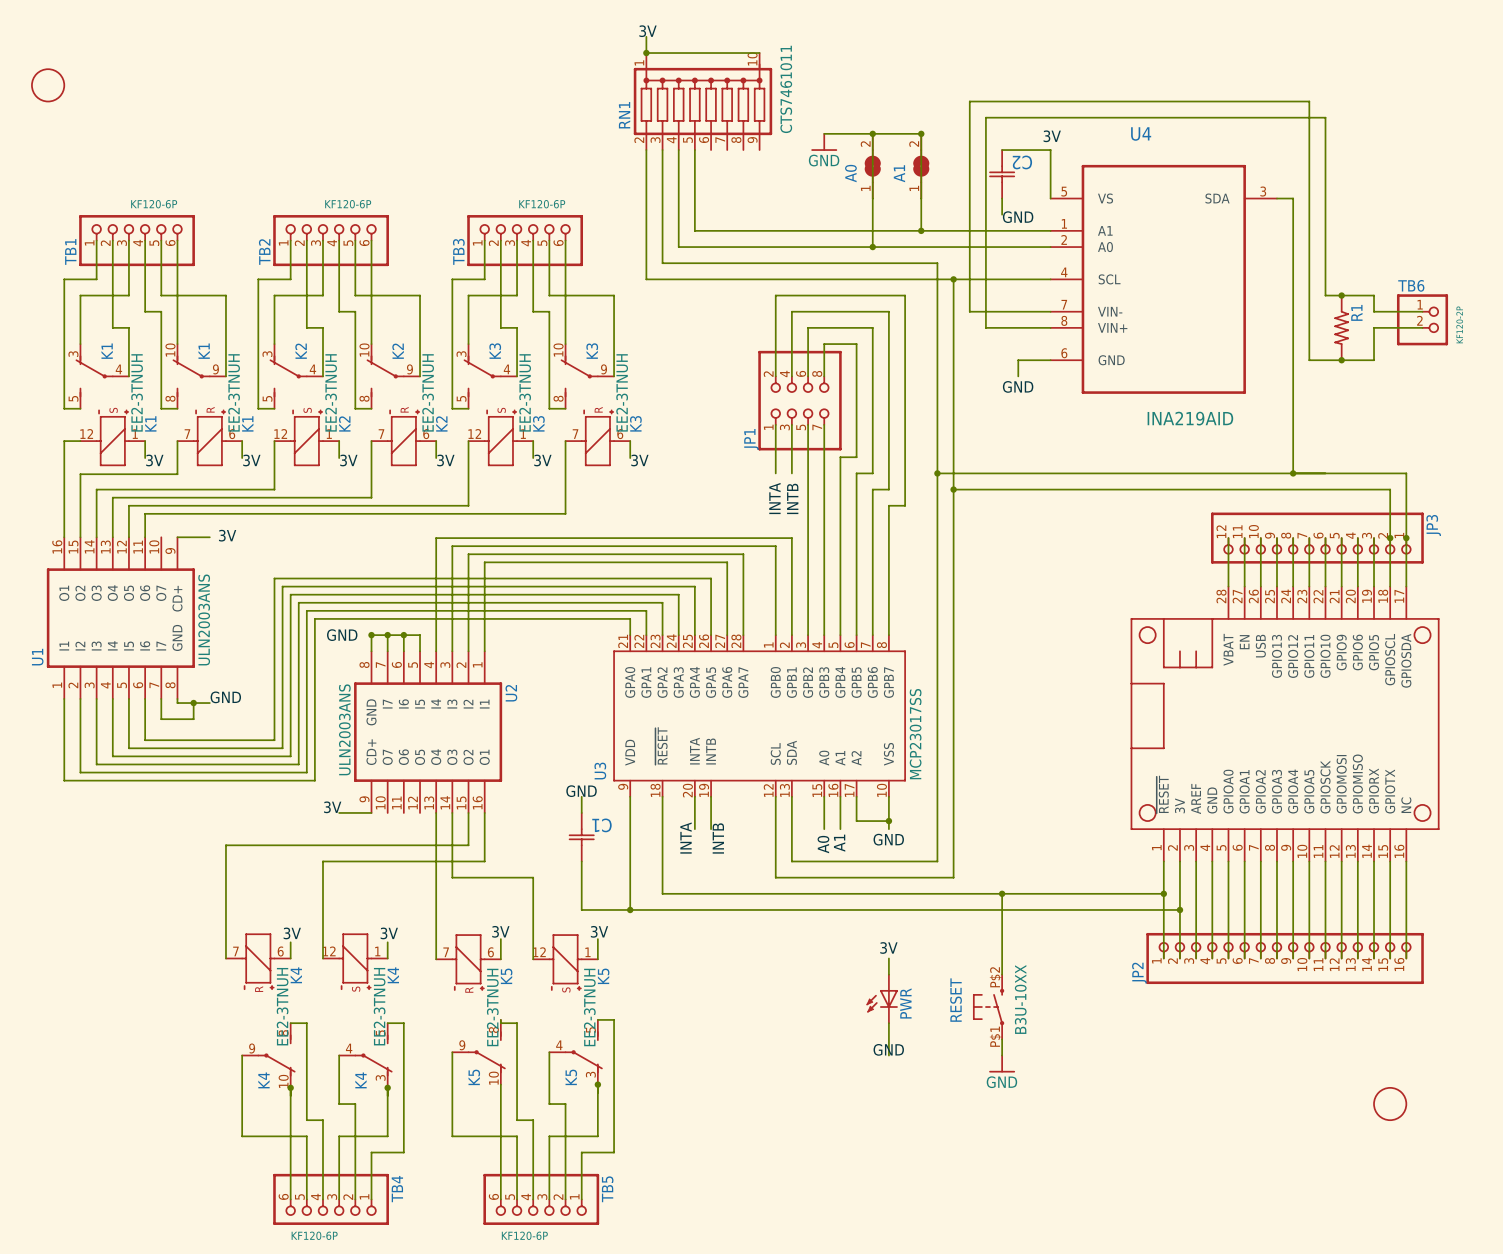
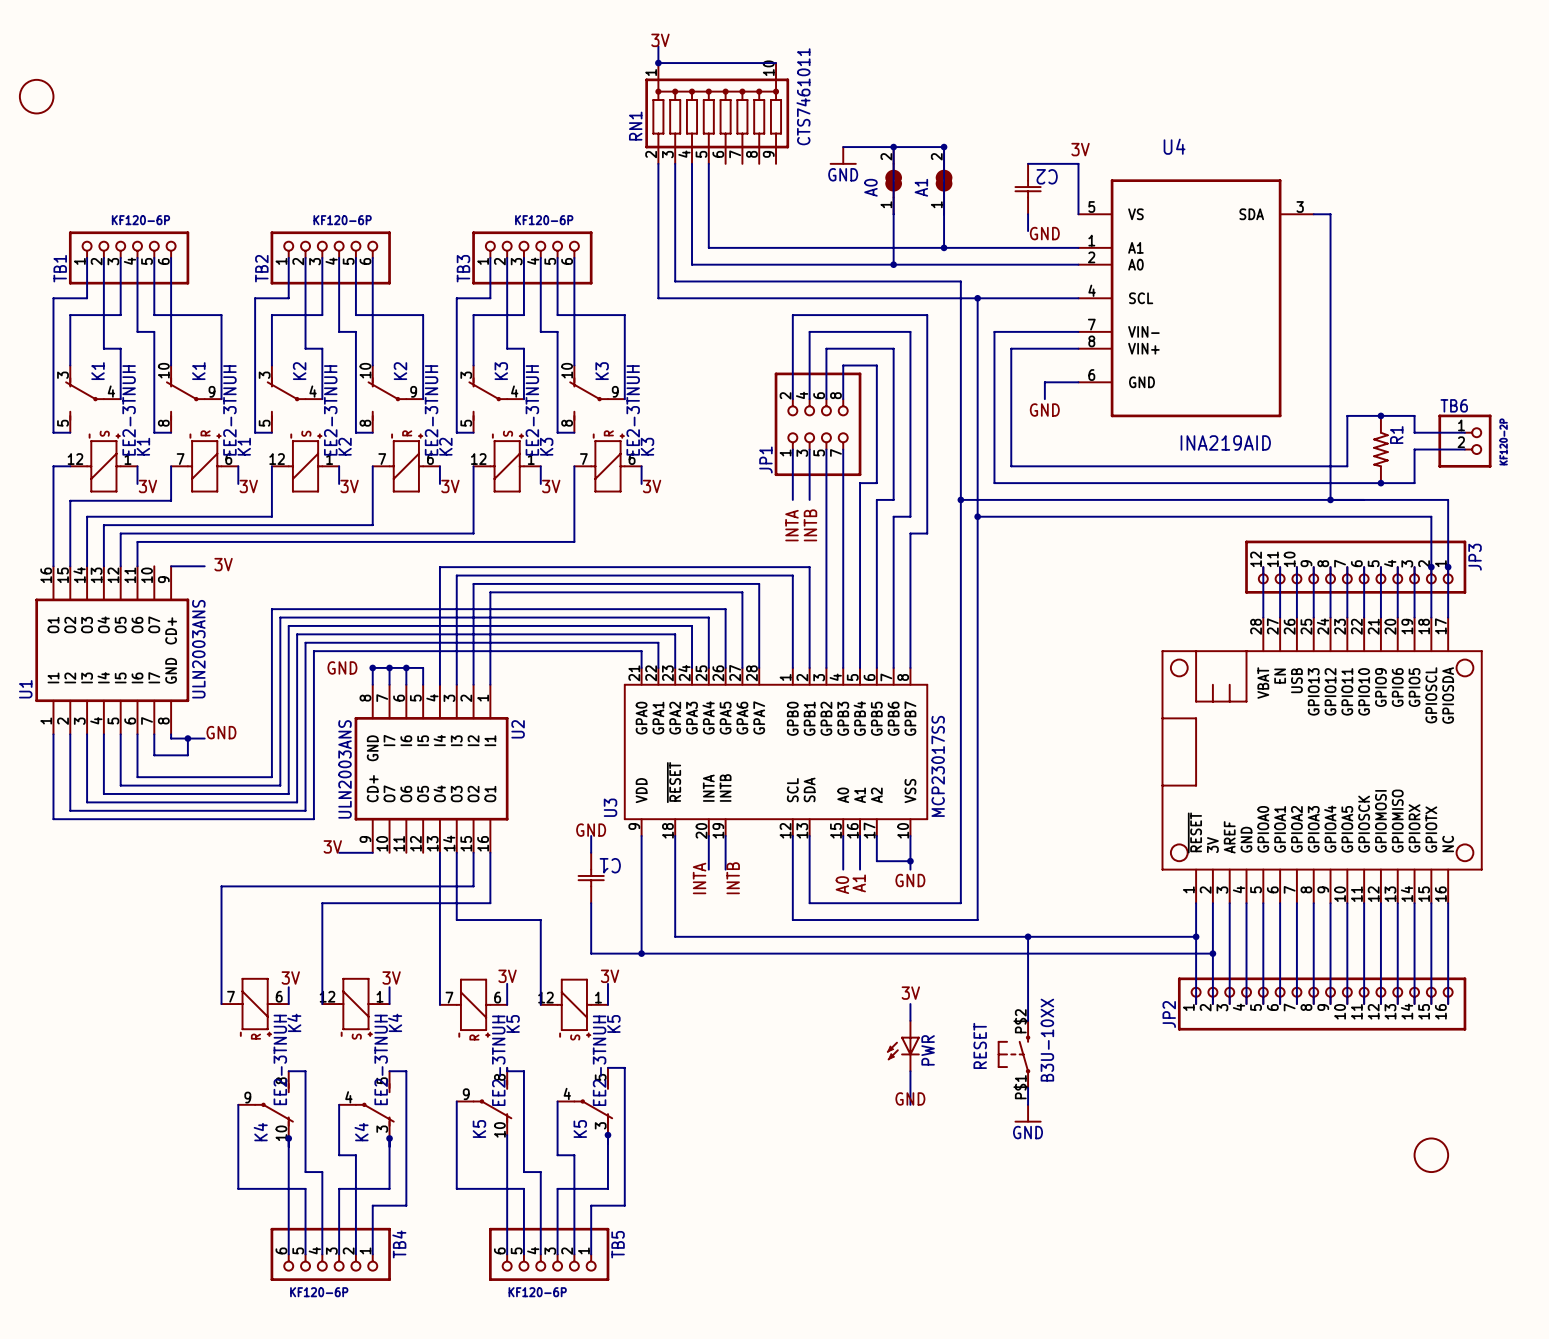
junction: (1341, 295) -> none
wire: (969, 311) (969, 101) (1309, 101) (1309, 360) (1374, 360) (1374, 327) (1422, 327) -> (994, 331) (994, 483) (1414, 483) (1414, 449) (1464, 449)
wire: (1422, 311) (1374, 311) (1374, 295) (1325, 295) (1325, 117) (985, 117) (985, 327) -> (1464, 432) (1414, 432) (1414, 415) (1347, 415) (1347, 466) (1011, 466) (1011, 348)
TB6 position: (1422, 319) -> (1464, 441)
R1 position: (1341, 327) -> (1380, 449)
junction position: (1341, 360) -> (1380, 415)
junction: none -> (1380, 483)

